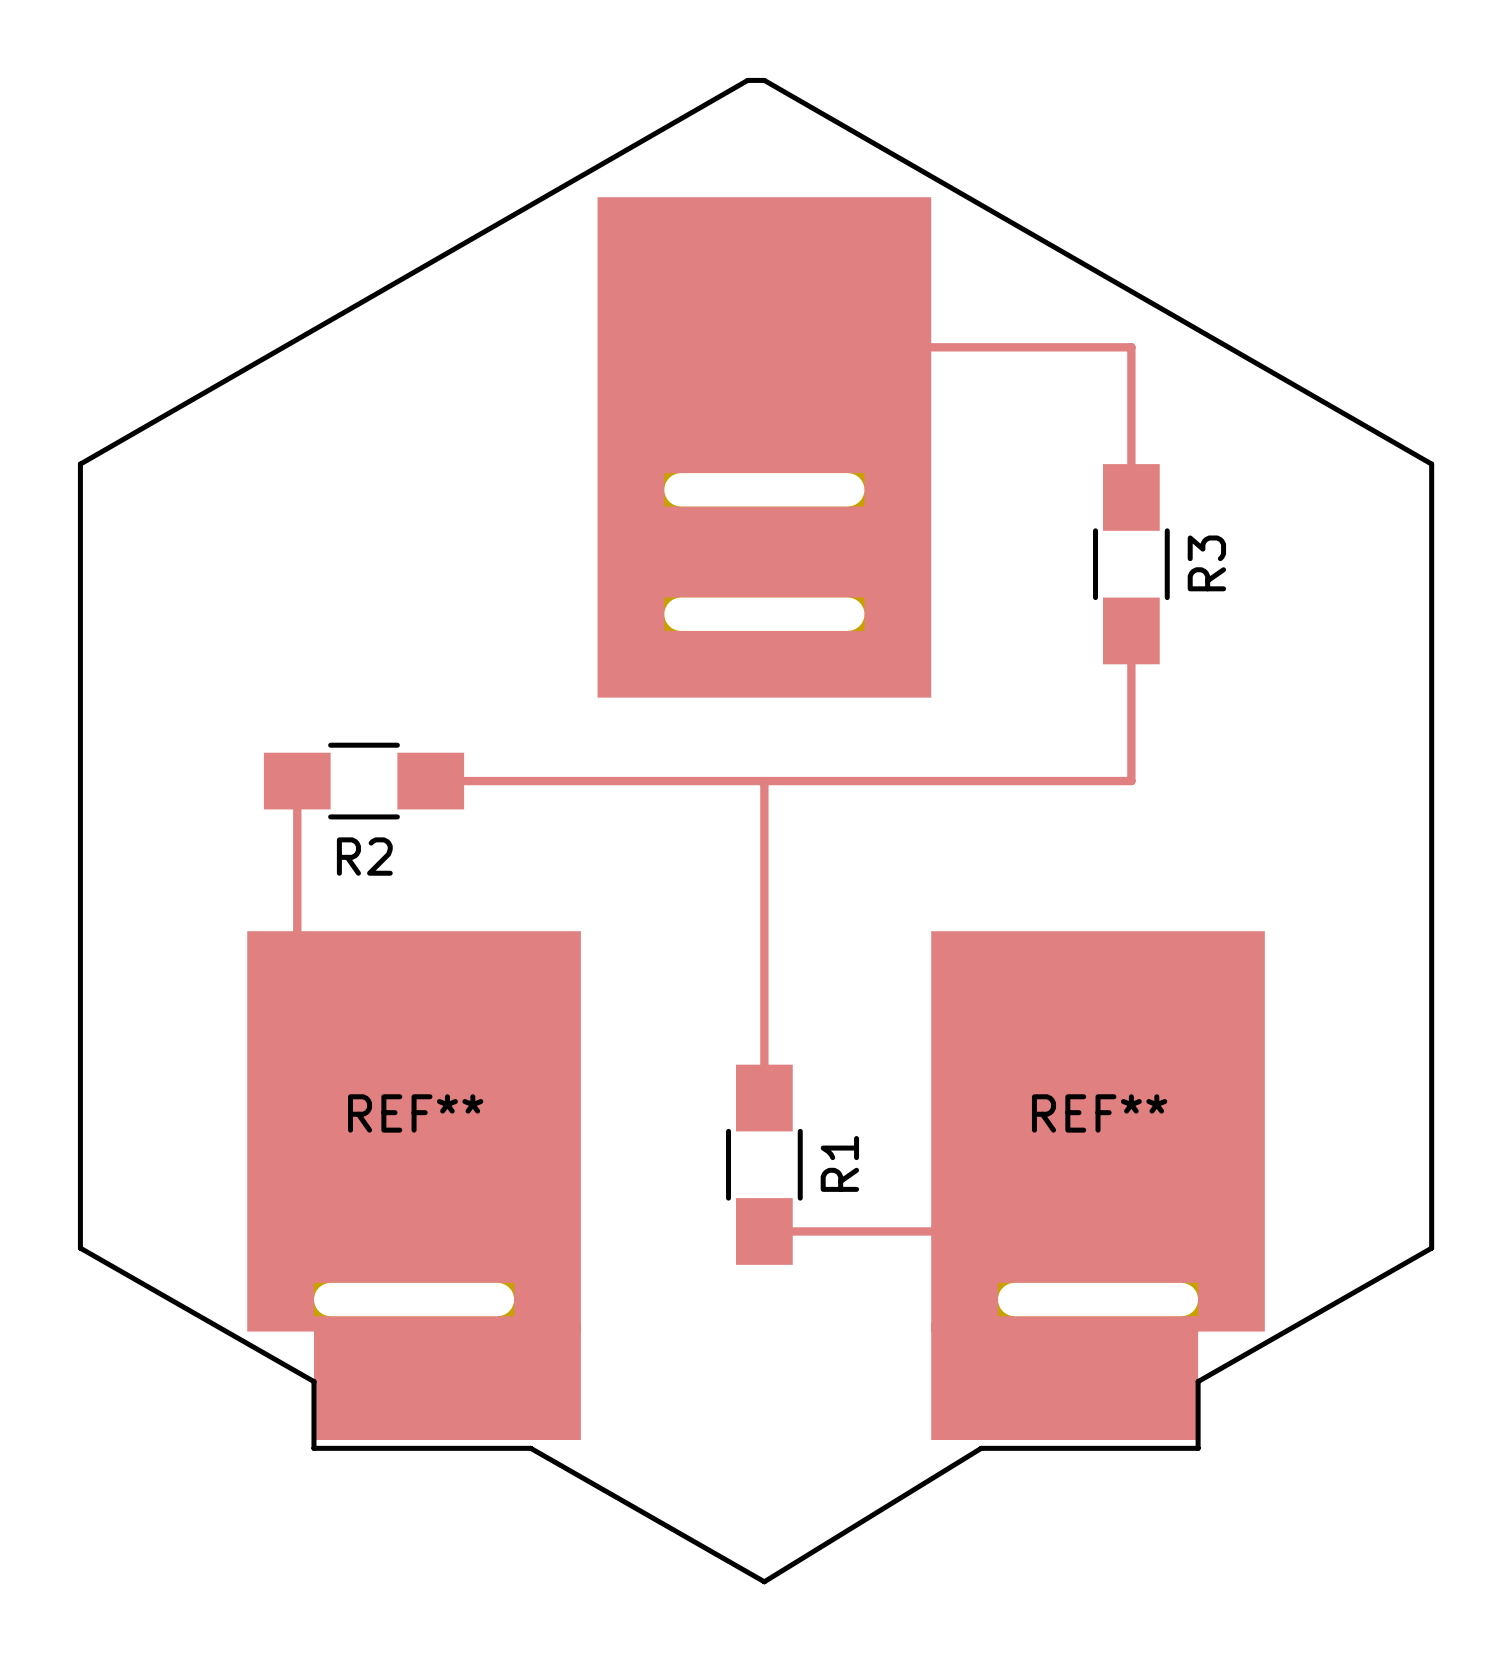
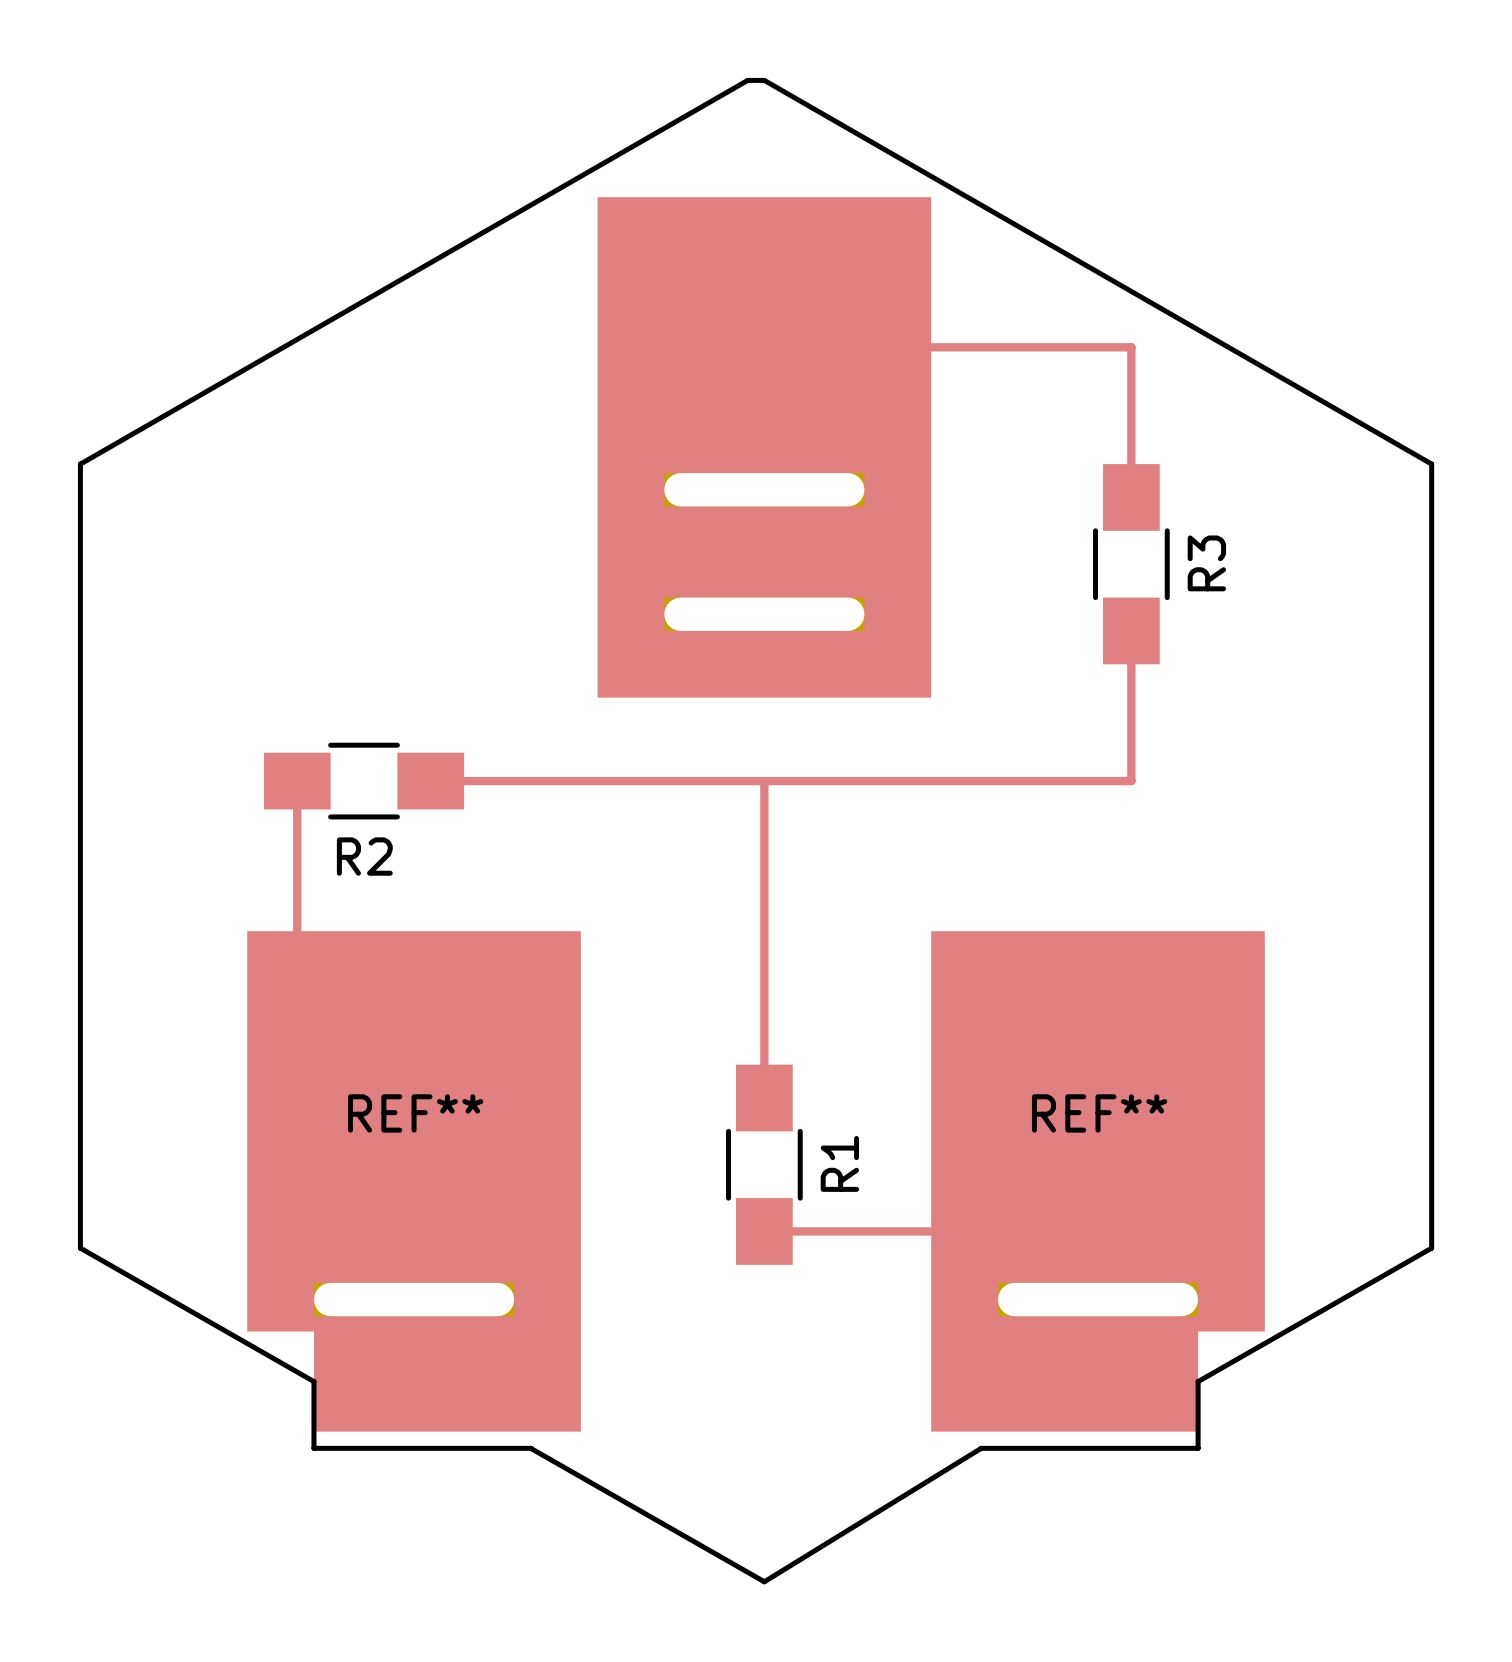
REF** footprint: [247, 931, 581, 1441] -> [247, 931, 581, 1432]
REF** footprint: [931, 931, 1265, 1441] -> [931, 931, 1265, 1432]

